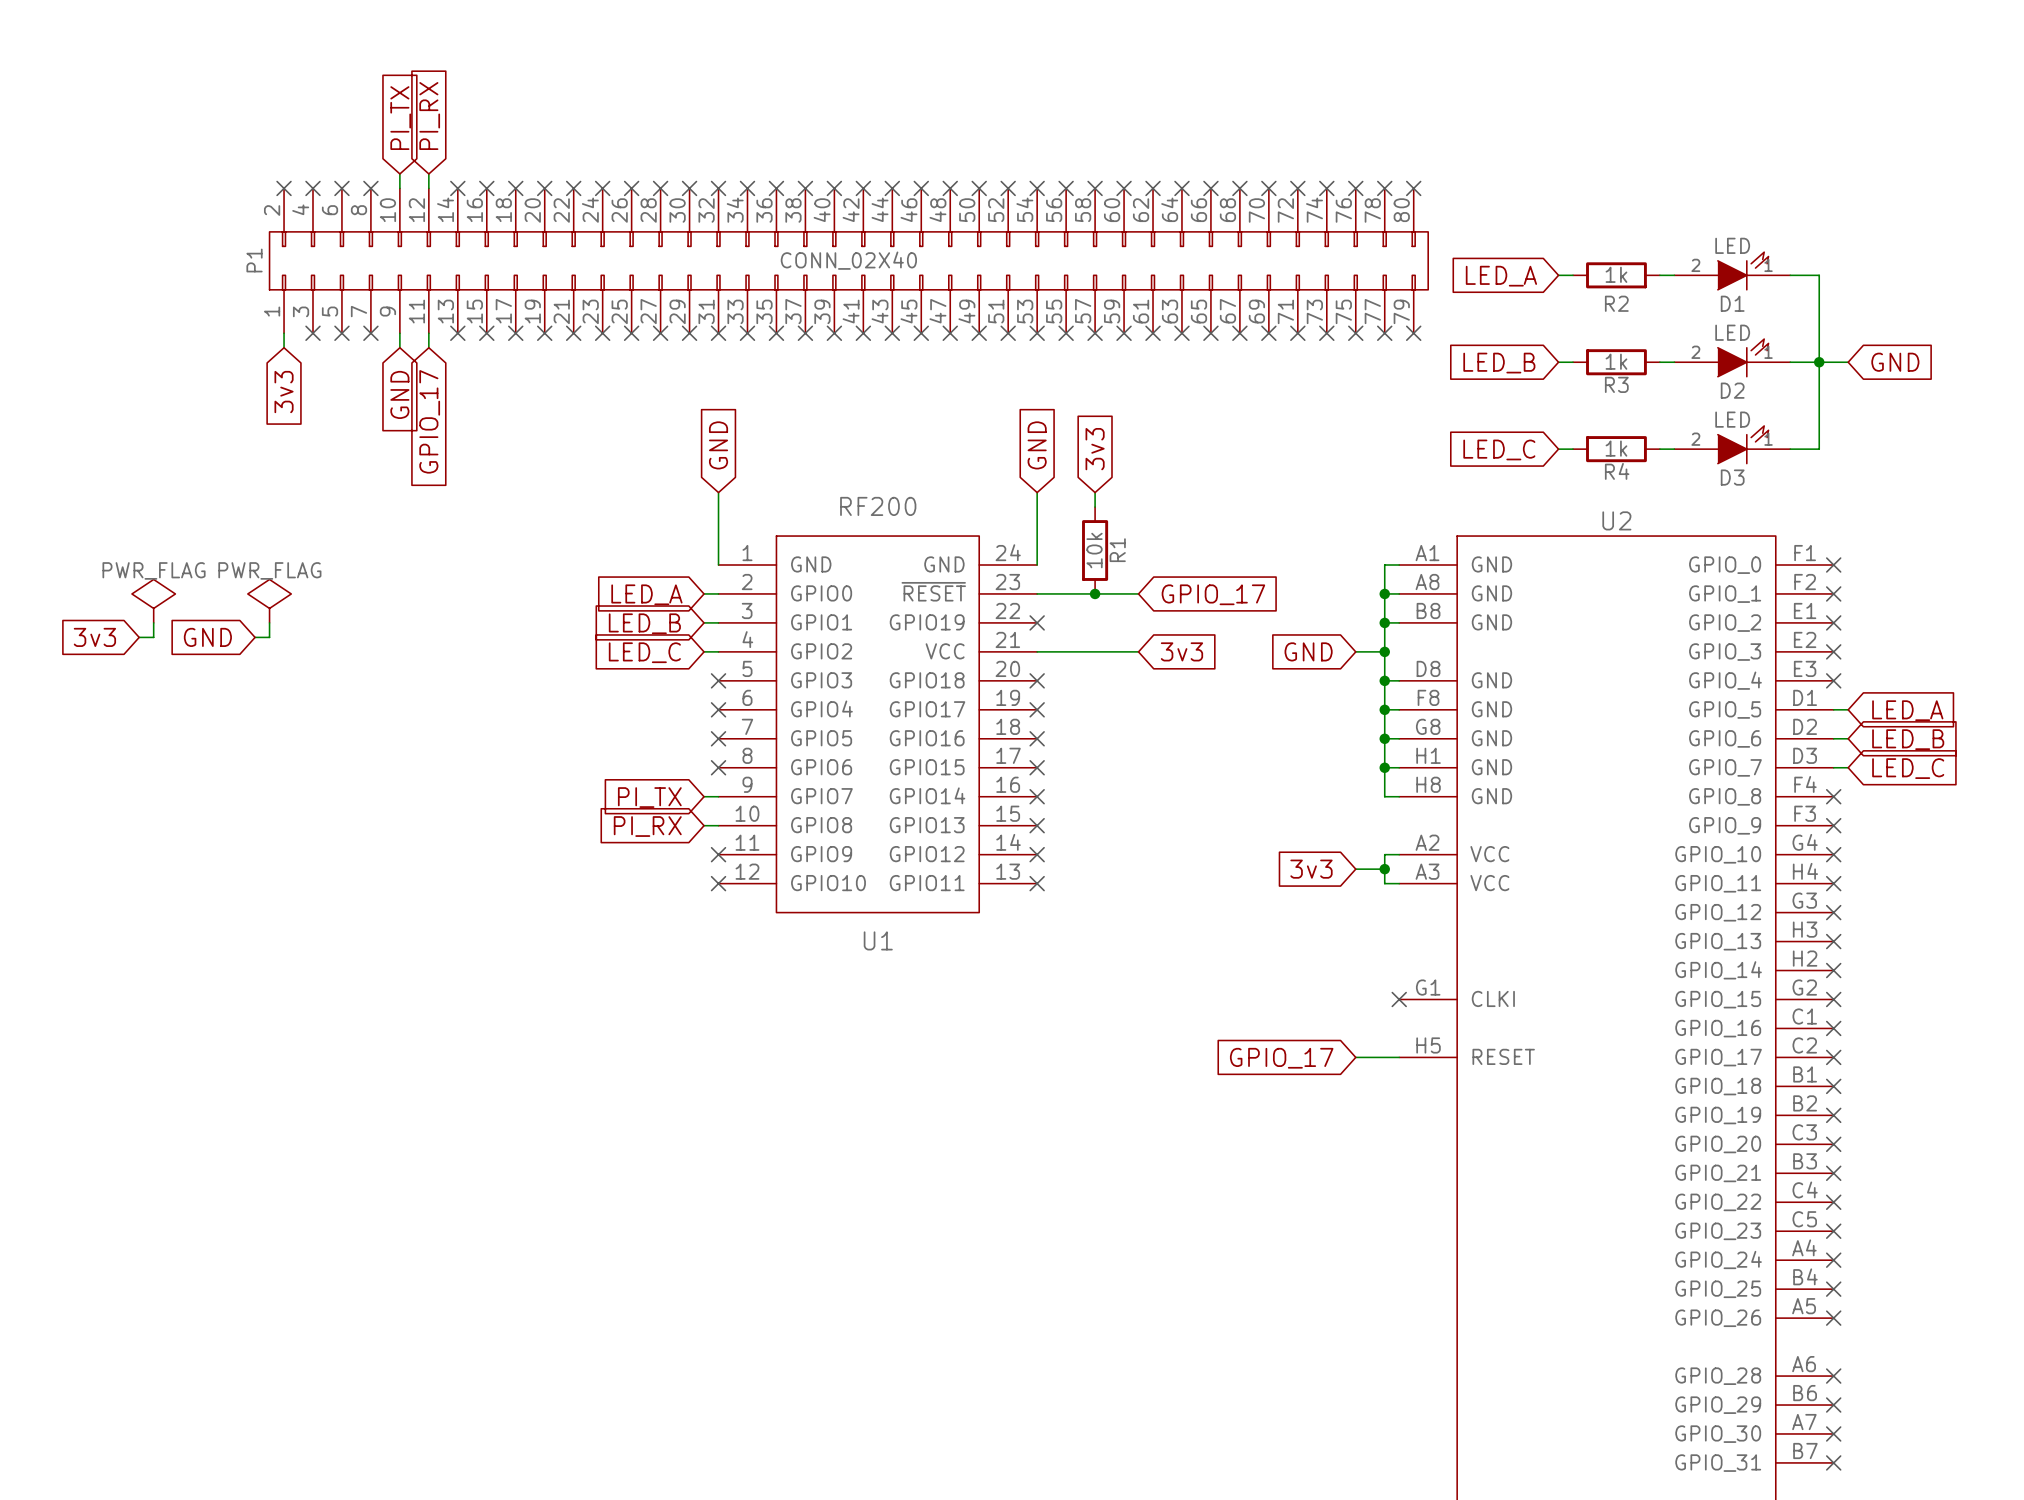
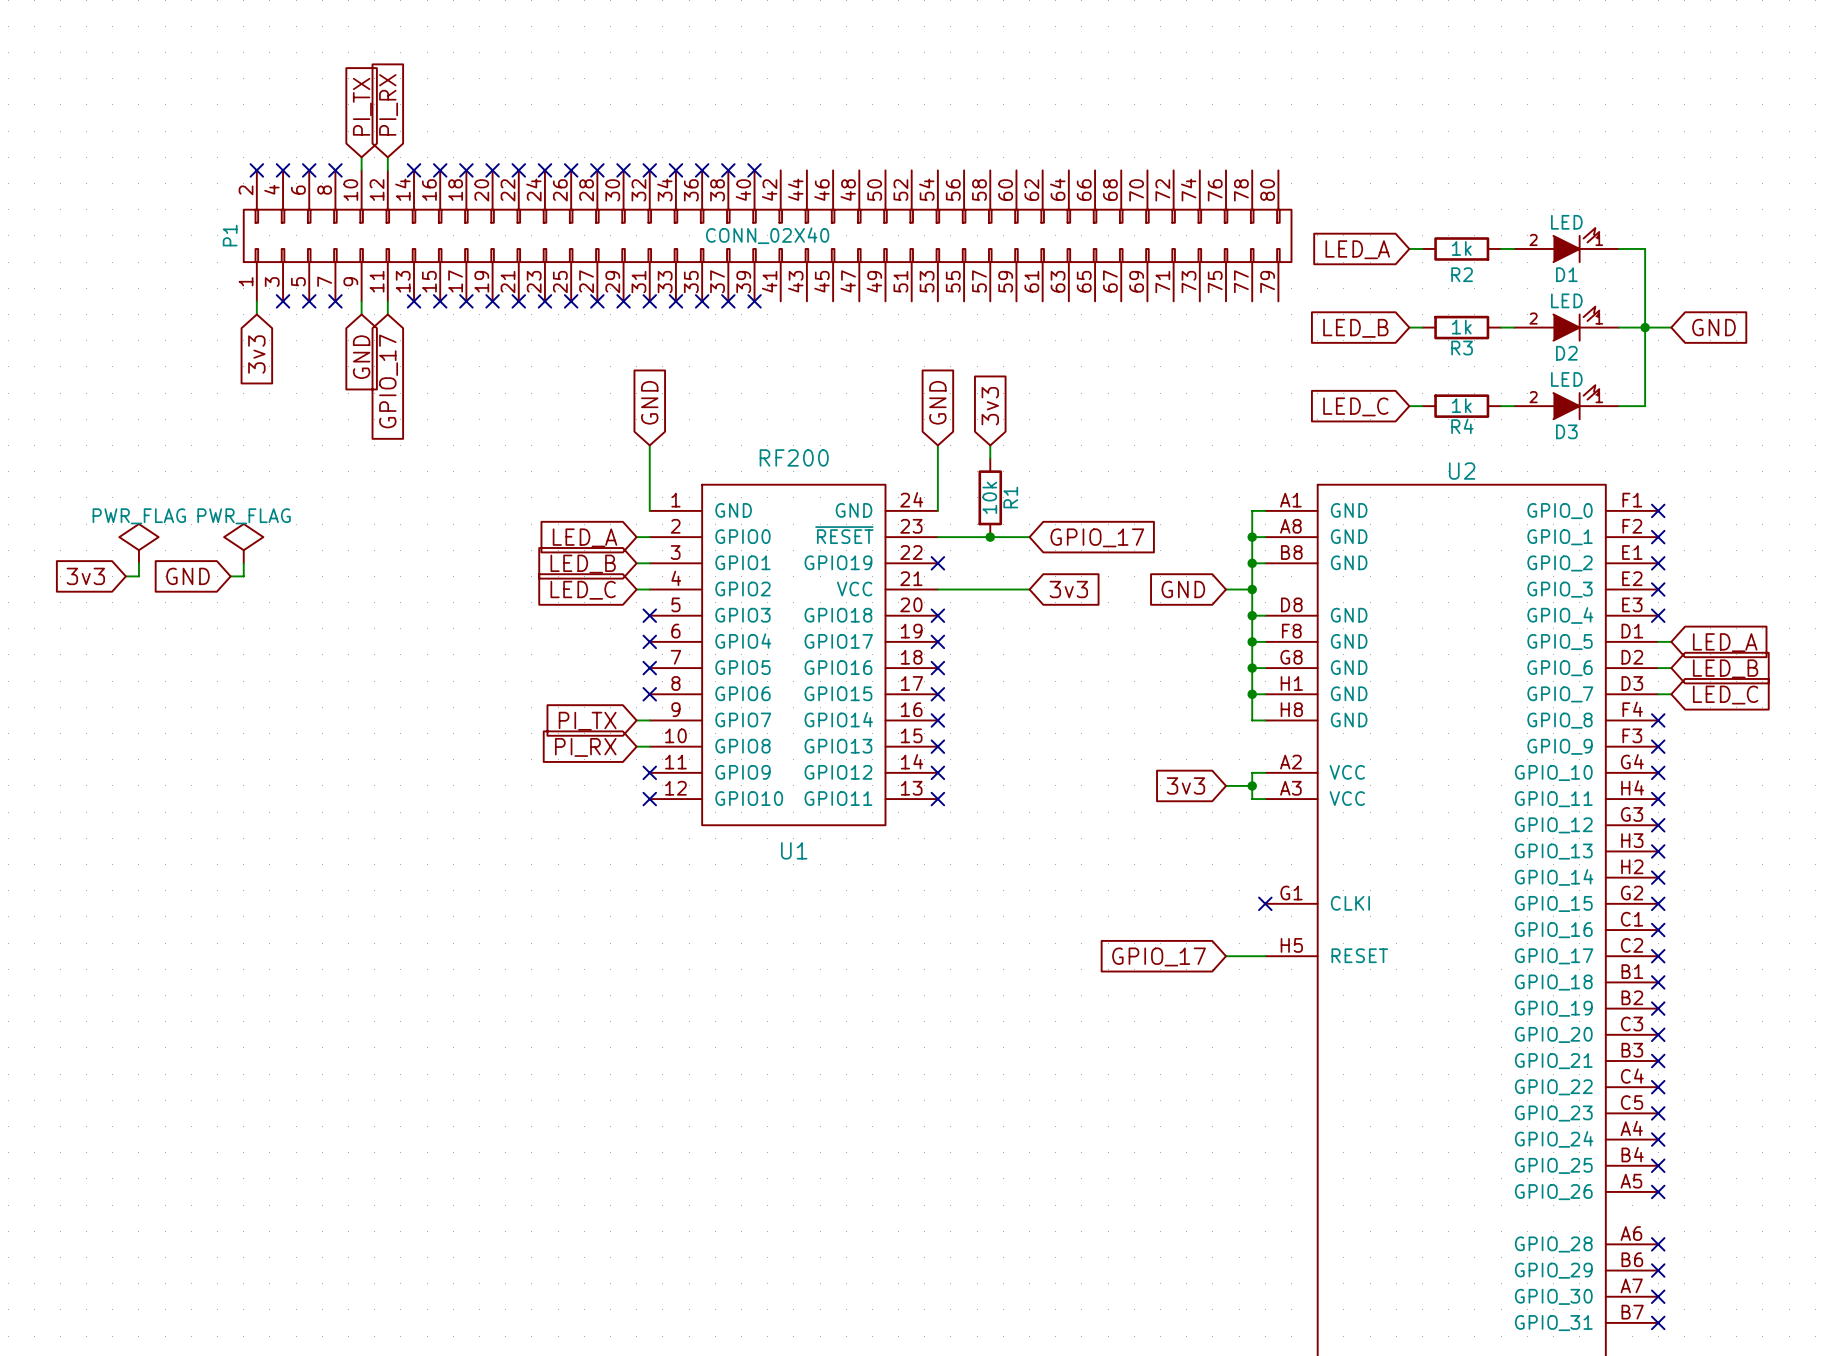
no-connect mark: (863, 188) -> none
no-connect mark: (892, 188) -> none
no-connect mark: (921, 188) -> none
no-connect mark: (950, 188) -> none
no-connect mark: (979, 188) -> none
no-connect mark: (1008, 188) -> none
no-connect mark: (1037, 188) -> none
no-connect mark: (1066, 188) -> none
no-connect mark: (1095, 188) -> none
no-connect mark: (1124, 188) -> none
no-connect mark: (1153, 188) -> none
no-connect mark: (1181, 188) -> none
no-connect mark: (1210, 188) -> none
no-connect mark: (1239, 188) -> none
no-connect mark: (1268, 188) -> none
no-connect mark: (1297, 188) -> none
no-connect mark: (1326, 188) -> none
no-connect mark: (1355, 188) -> none
no-connect mark: (1384, 188) -> none
no-connect mark: (1413, 188) -> none
no-connect mark: (863, 333) -> none
no-connect mark: (892, 333) -> none
no-connect mark: (921, 333) -> none
no-connect mark: (950, 333) -> none
no-connect mark: (979, 333) -> none
no-connect mark: (1008, 333) -> none
no-connect mark: (1037, 333) -> none
no-connect mark: (1066, 333) -> none
no-connect mark: (1095, 333) -> none
no-connect mark: (1124, 333) -> none
no-connect mark: (1153, 333) -> none
no-connect mark: (1181, 333) -> none
no-connect mark: (1210, 333) -> none
no-connect mark: (1239, 333) -> none
no-connect mark: (1268, 333) -> none
no-connect mark: (1297, 333) -> none
no-connect mark: (1326, 333) -> none
no-connect mark: (1355, 333) -> none
no-connect mark: (1384, 333) -> none
no-connect mark: (1413, 333) -> none

